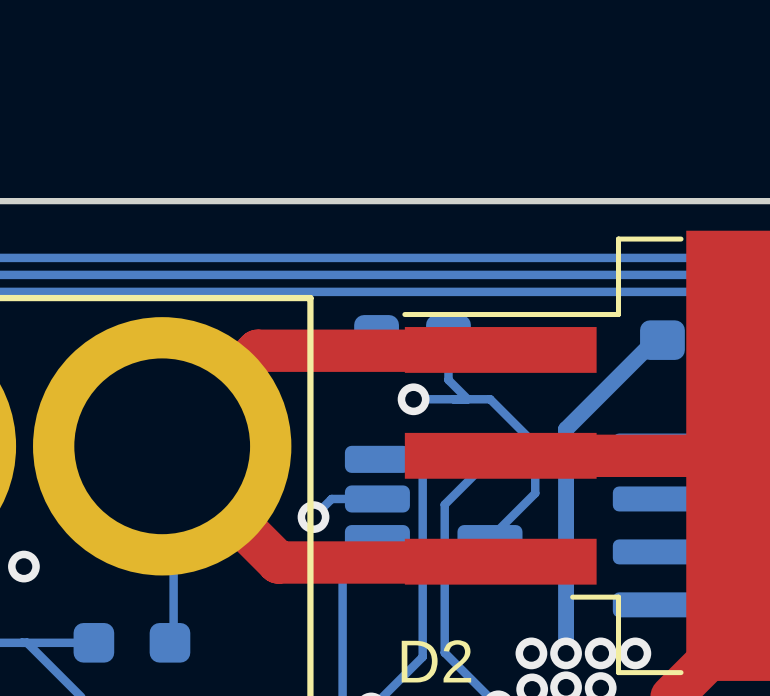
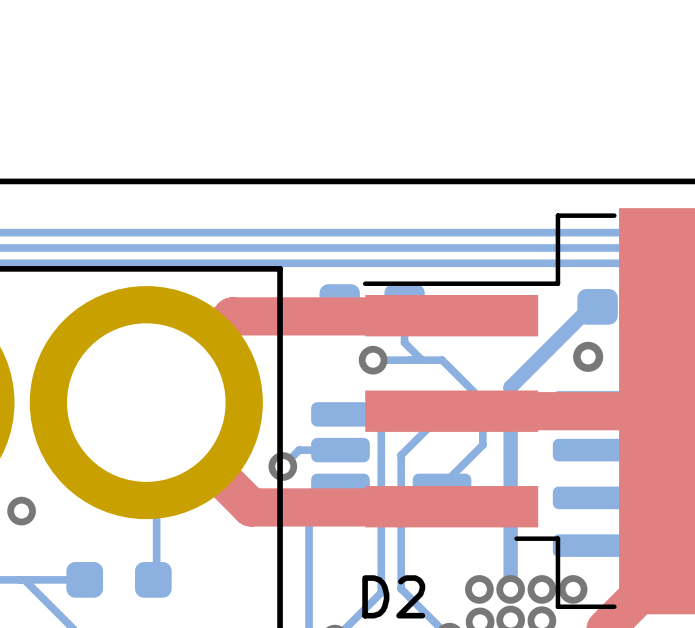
via: none -> (588, 356)

